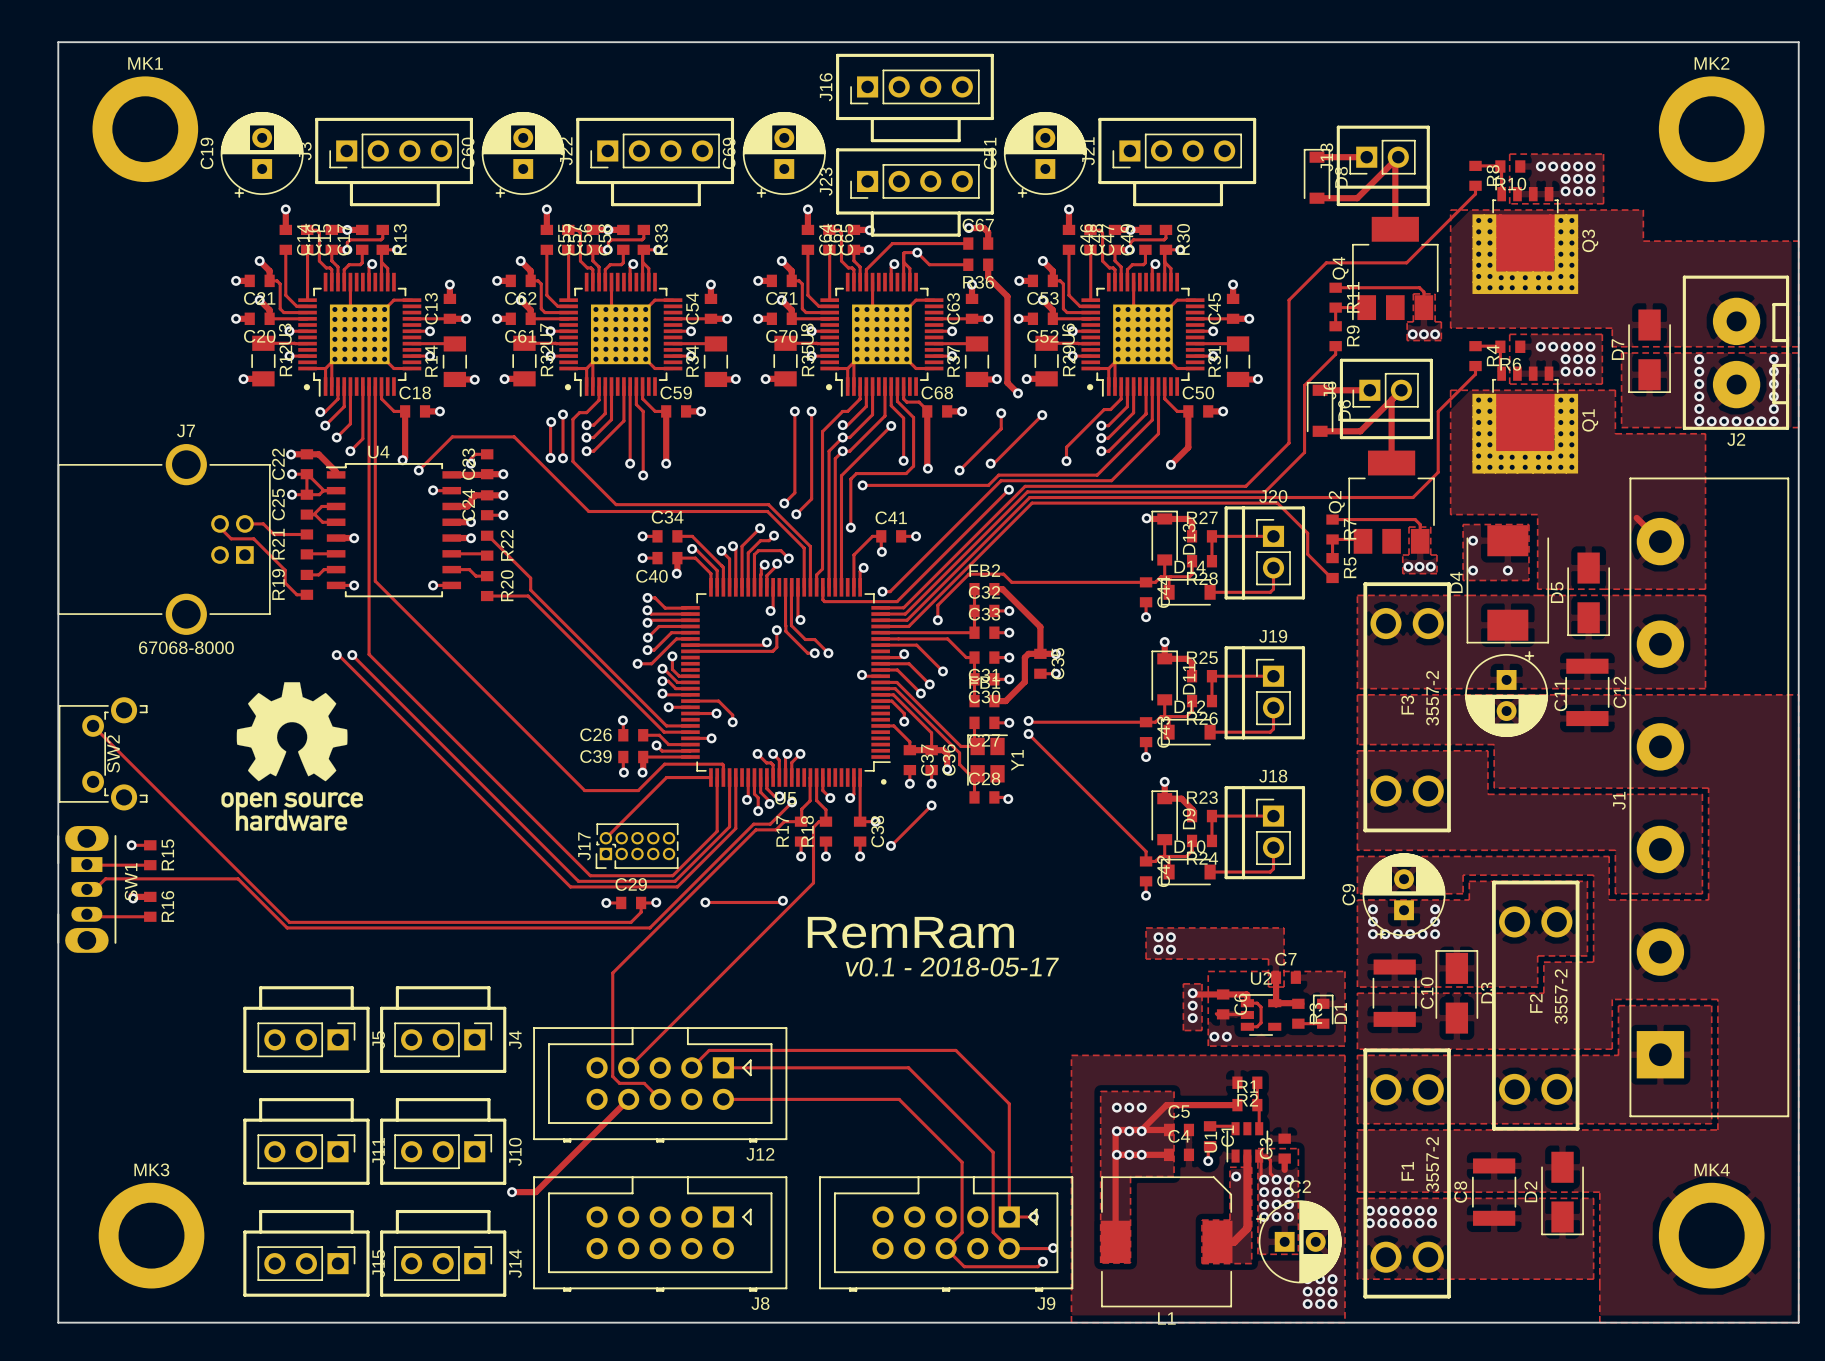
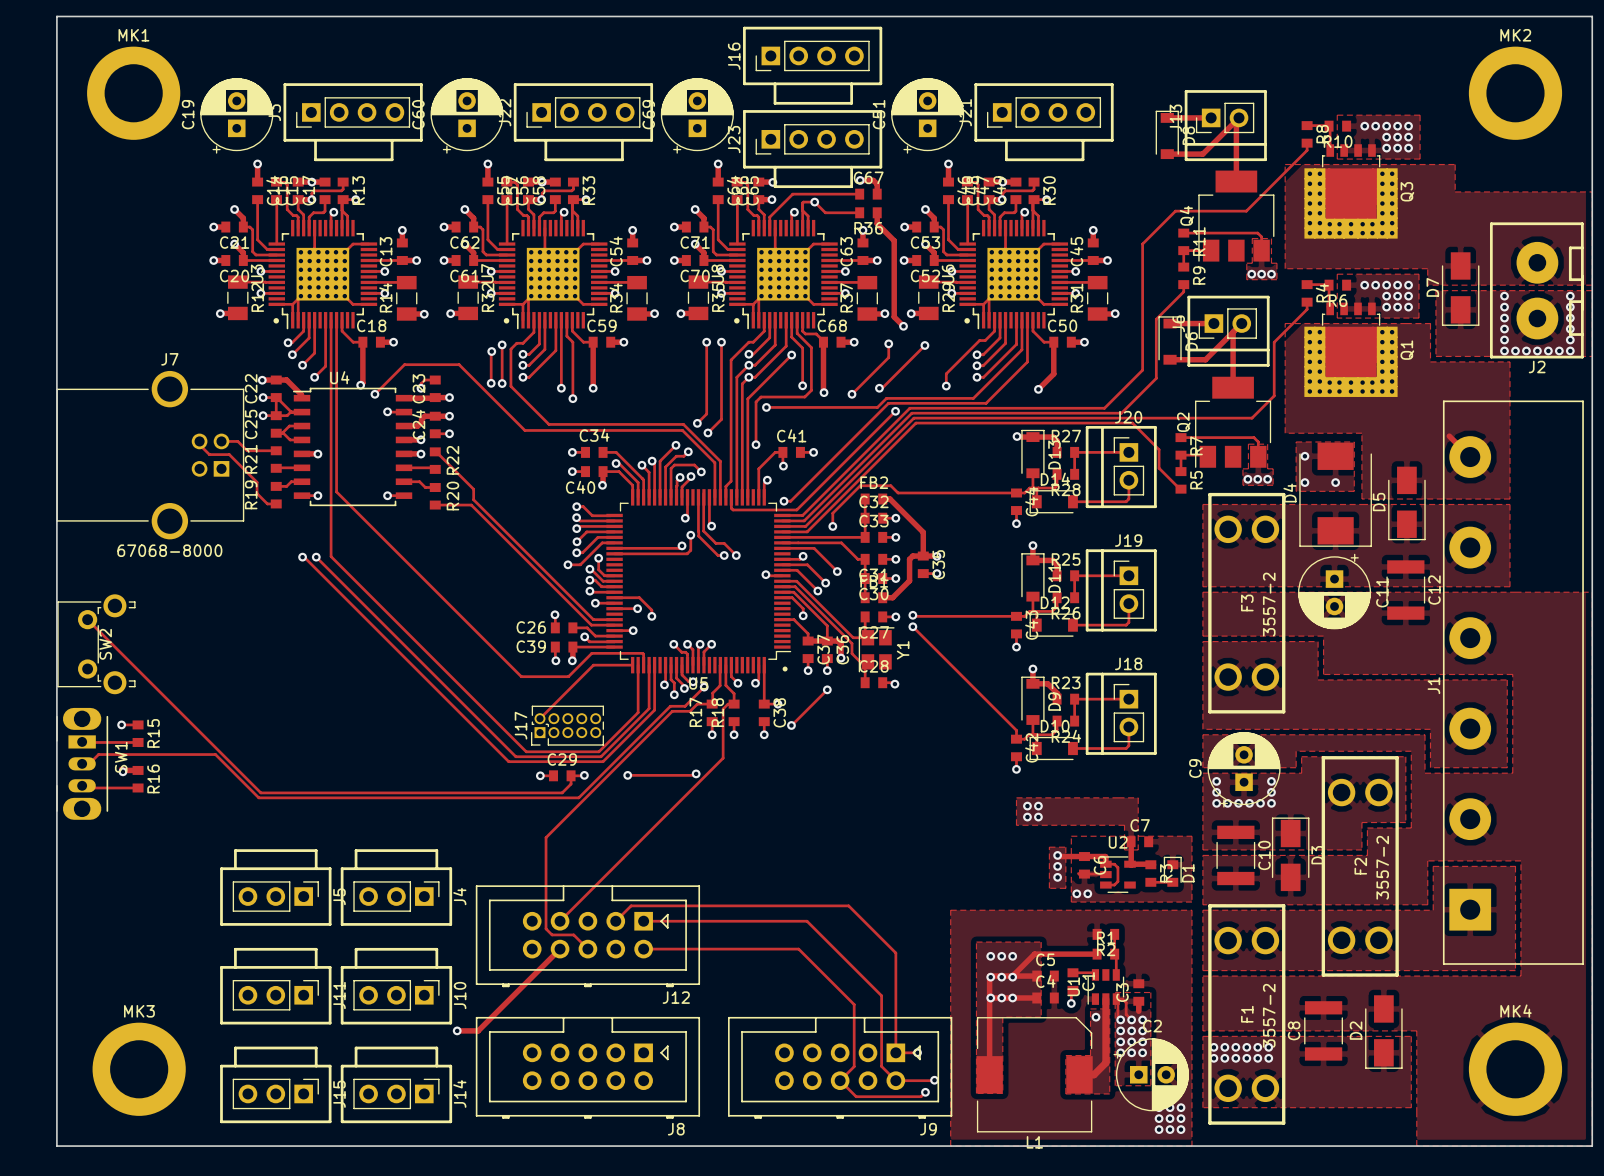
drawing: [221, 682, 363, 831] -> none
text: RemRam (910, 932) -> none
text: v0.1 - 2018-05-17 (952, 967) -> none

